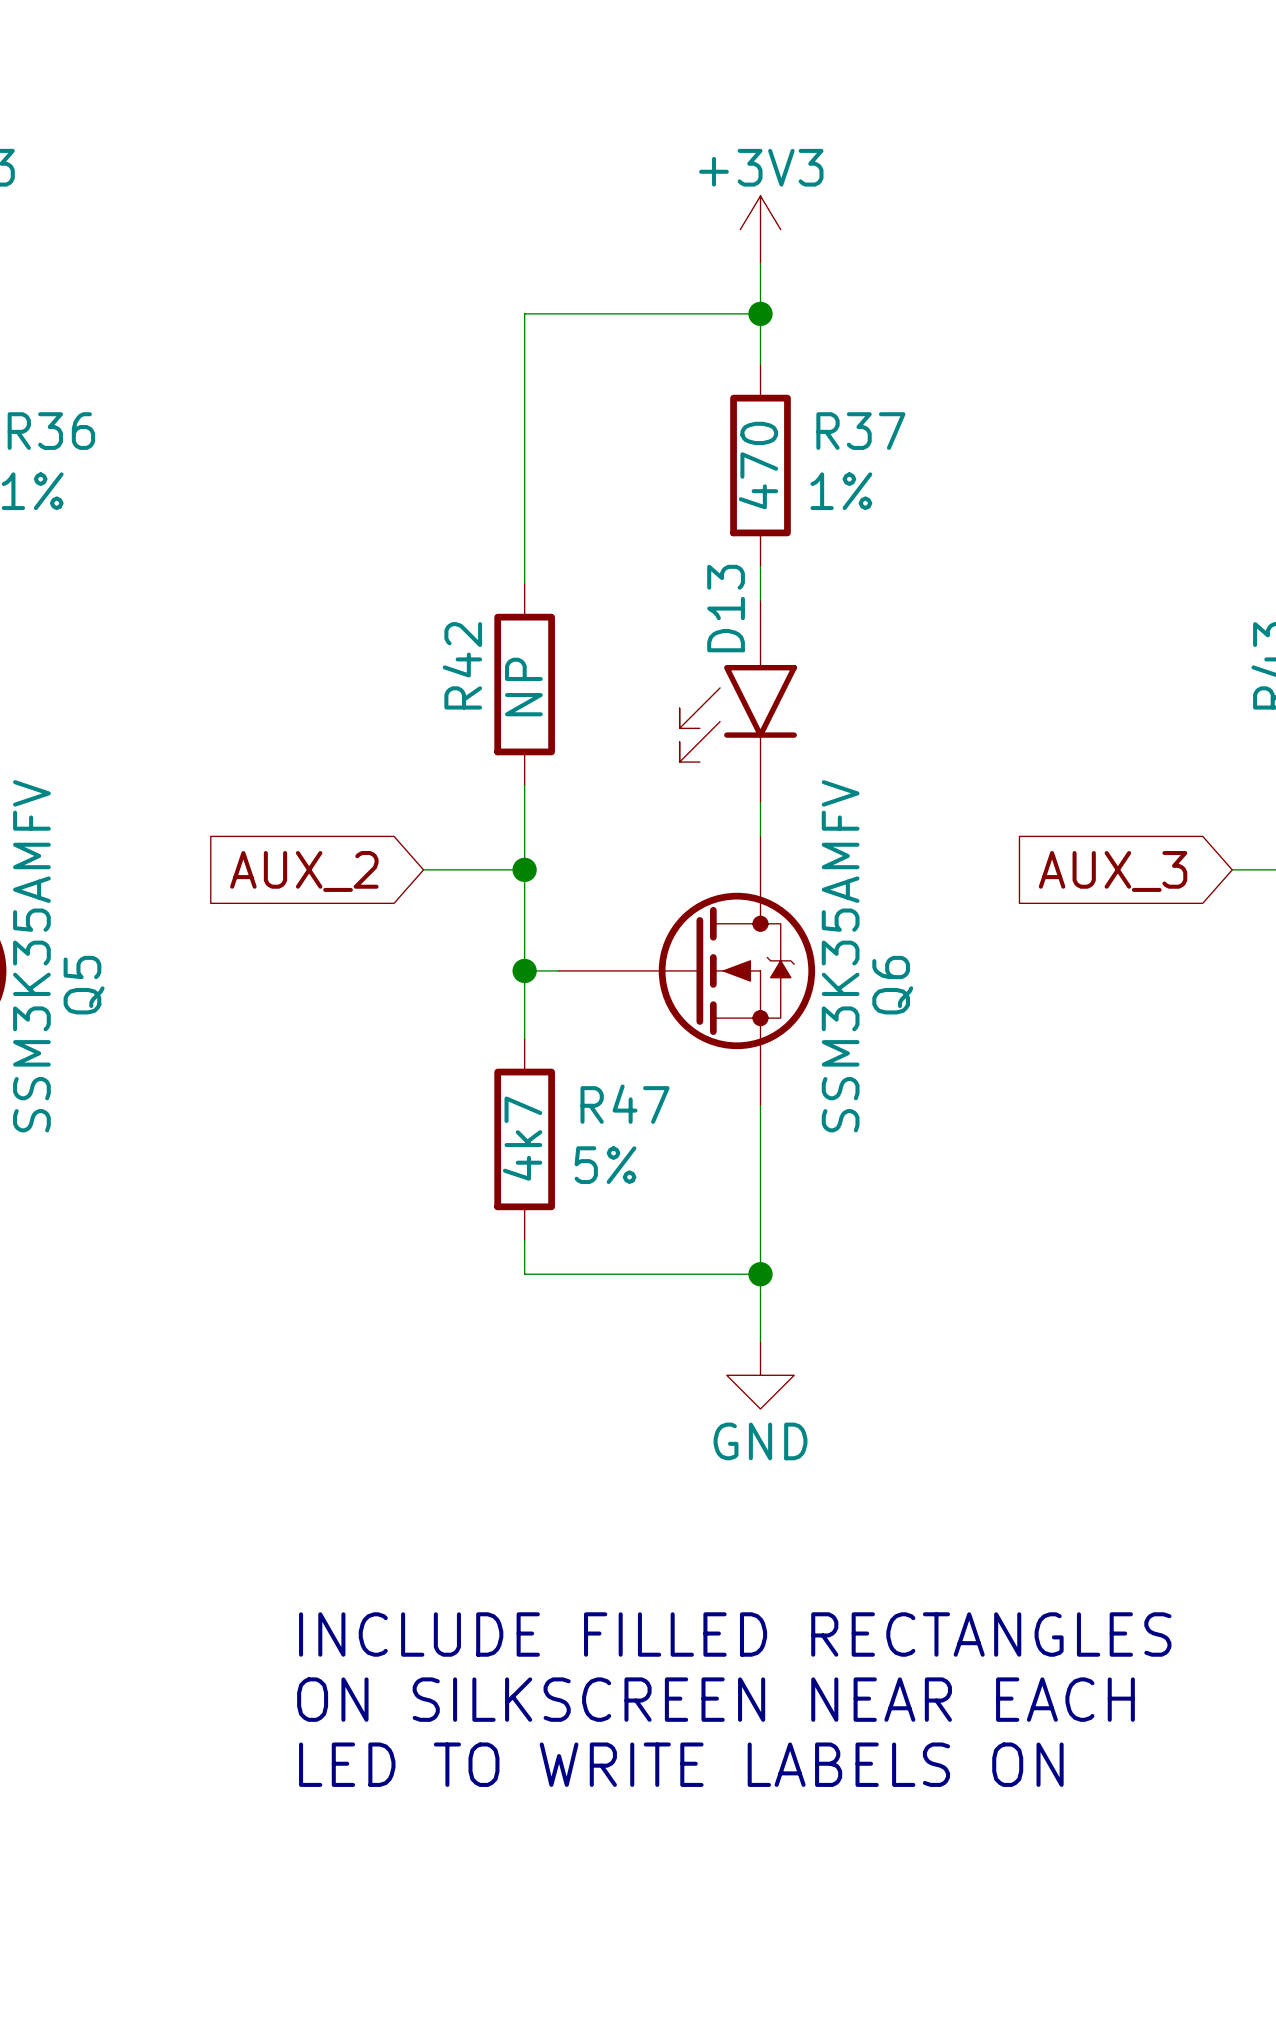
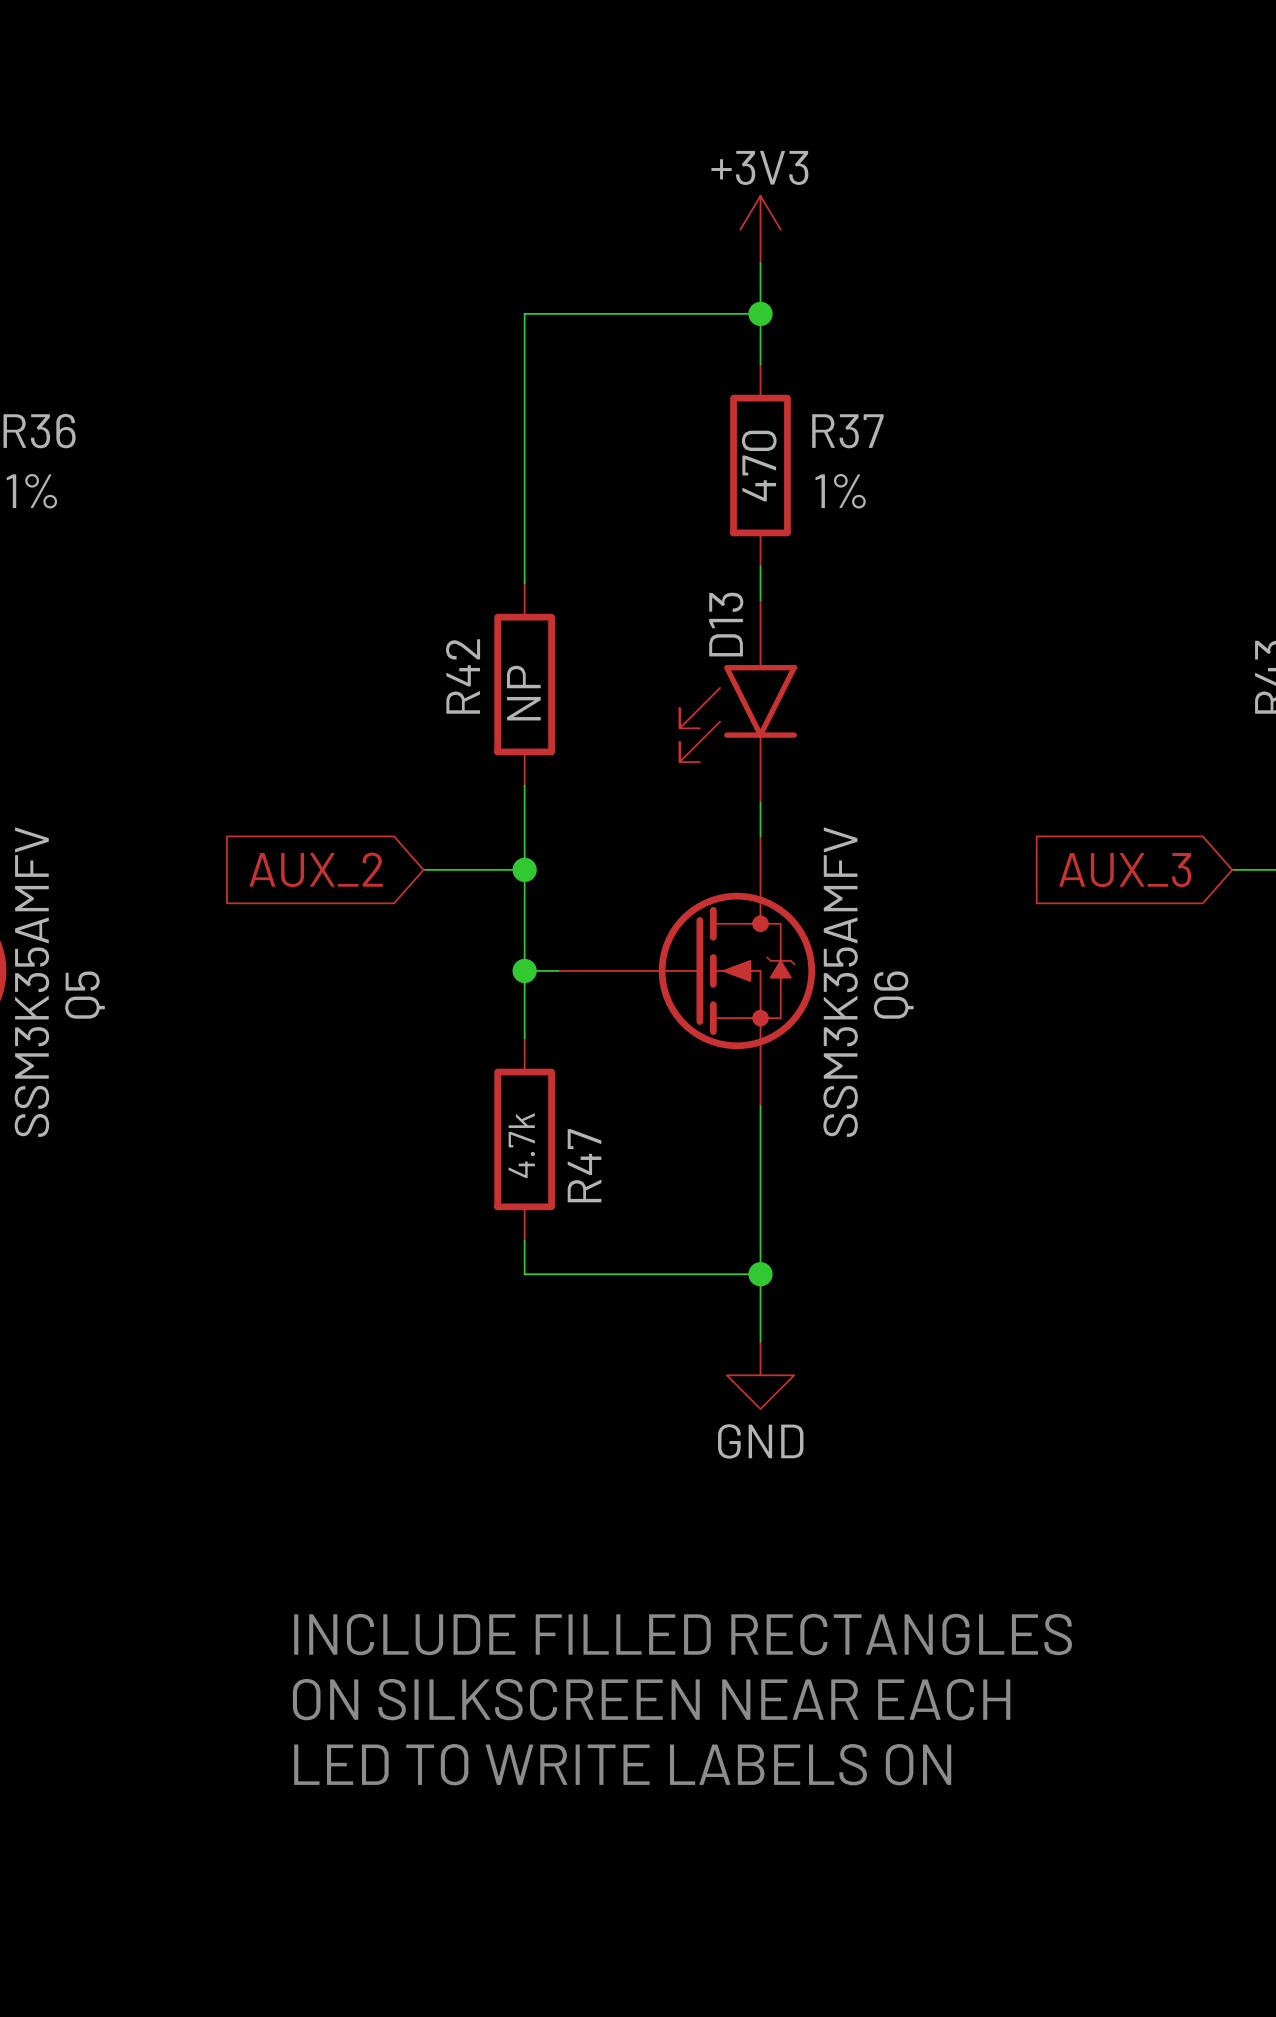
R47 name rotation: 0° (625, 1104) -> 90° counterclockwise (584, 1165)
R47 text: none -> 4.7k (521, 1145)
R47 text: 4k7 (522, 1138) -> none
R47 text: 5% (605, 1165) -> none

